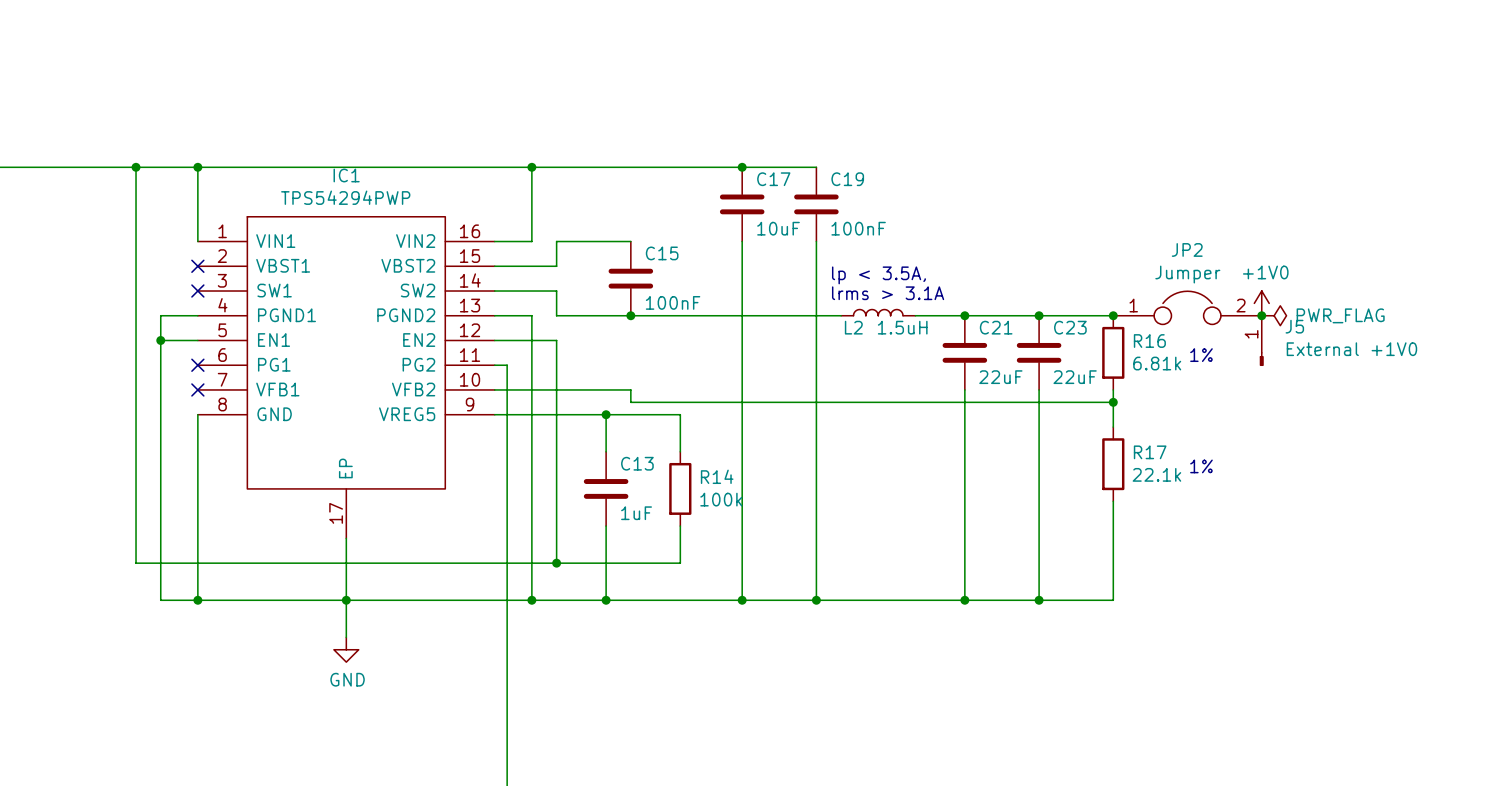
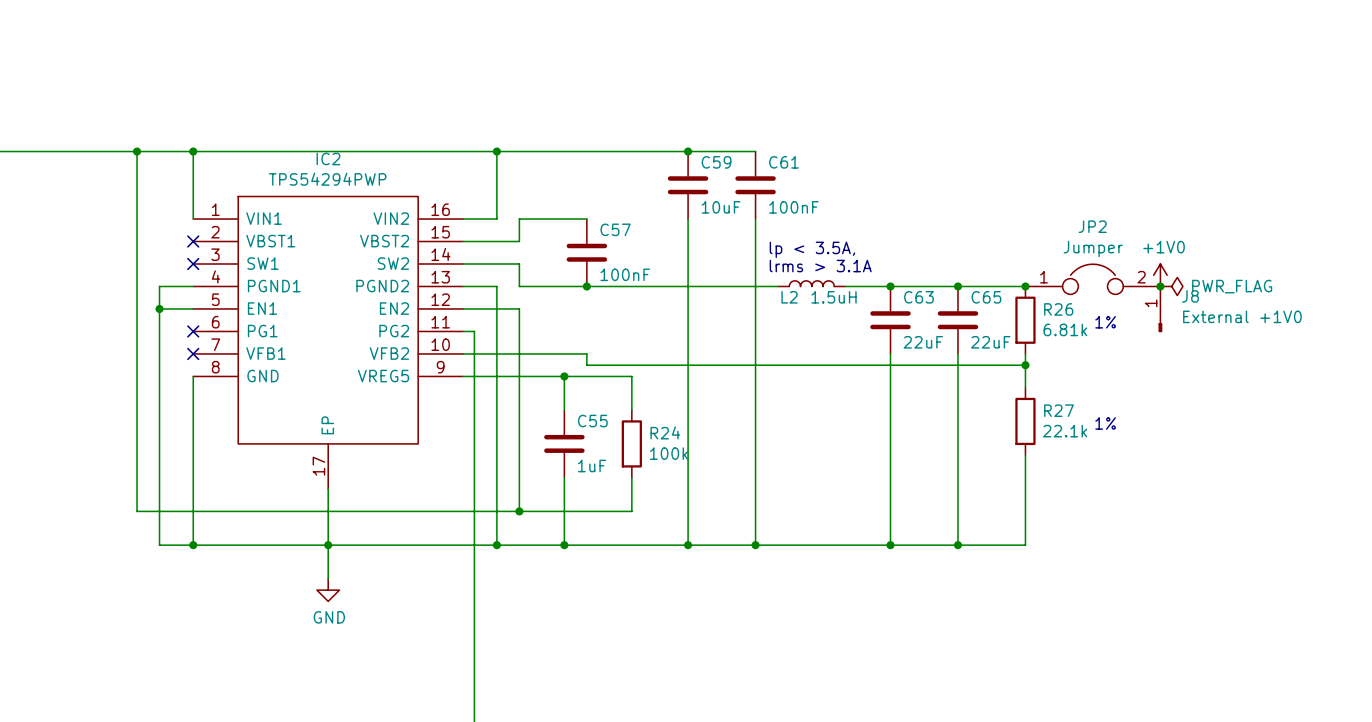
IC1 name: IC1 (346, 175) -> IC2 (328, 158)
C17 name: C17 (773, 179) -> C59 (716, 162)
C19 name: C19 (847, 179) -> C61 (784, 162)
C15 name: C15 (662, 253) -> C57 (615, 229)
J5 name: J5 (1294, 326) -> J8 (1190, 296)
C21 name: C21 (996, 327) -> C63 (918, 297)
C23 name: C23 (1070, 327) -> C65 (986, 297)
R16 name: R16 (1149, 341) -> R26 (1058, 309)
R17 name: R17 (1150, 452) -> R27 (1058, 410)
C13 name: C13 (637, 463) -> C55 (592, 421)
R14 name: R14 (717, 476) -> R24 (665, 432)

